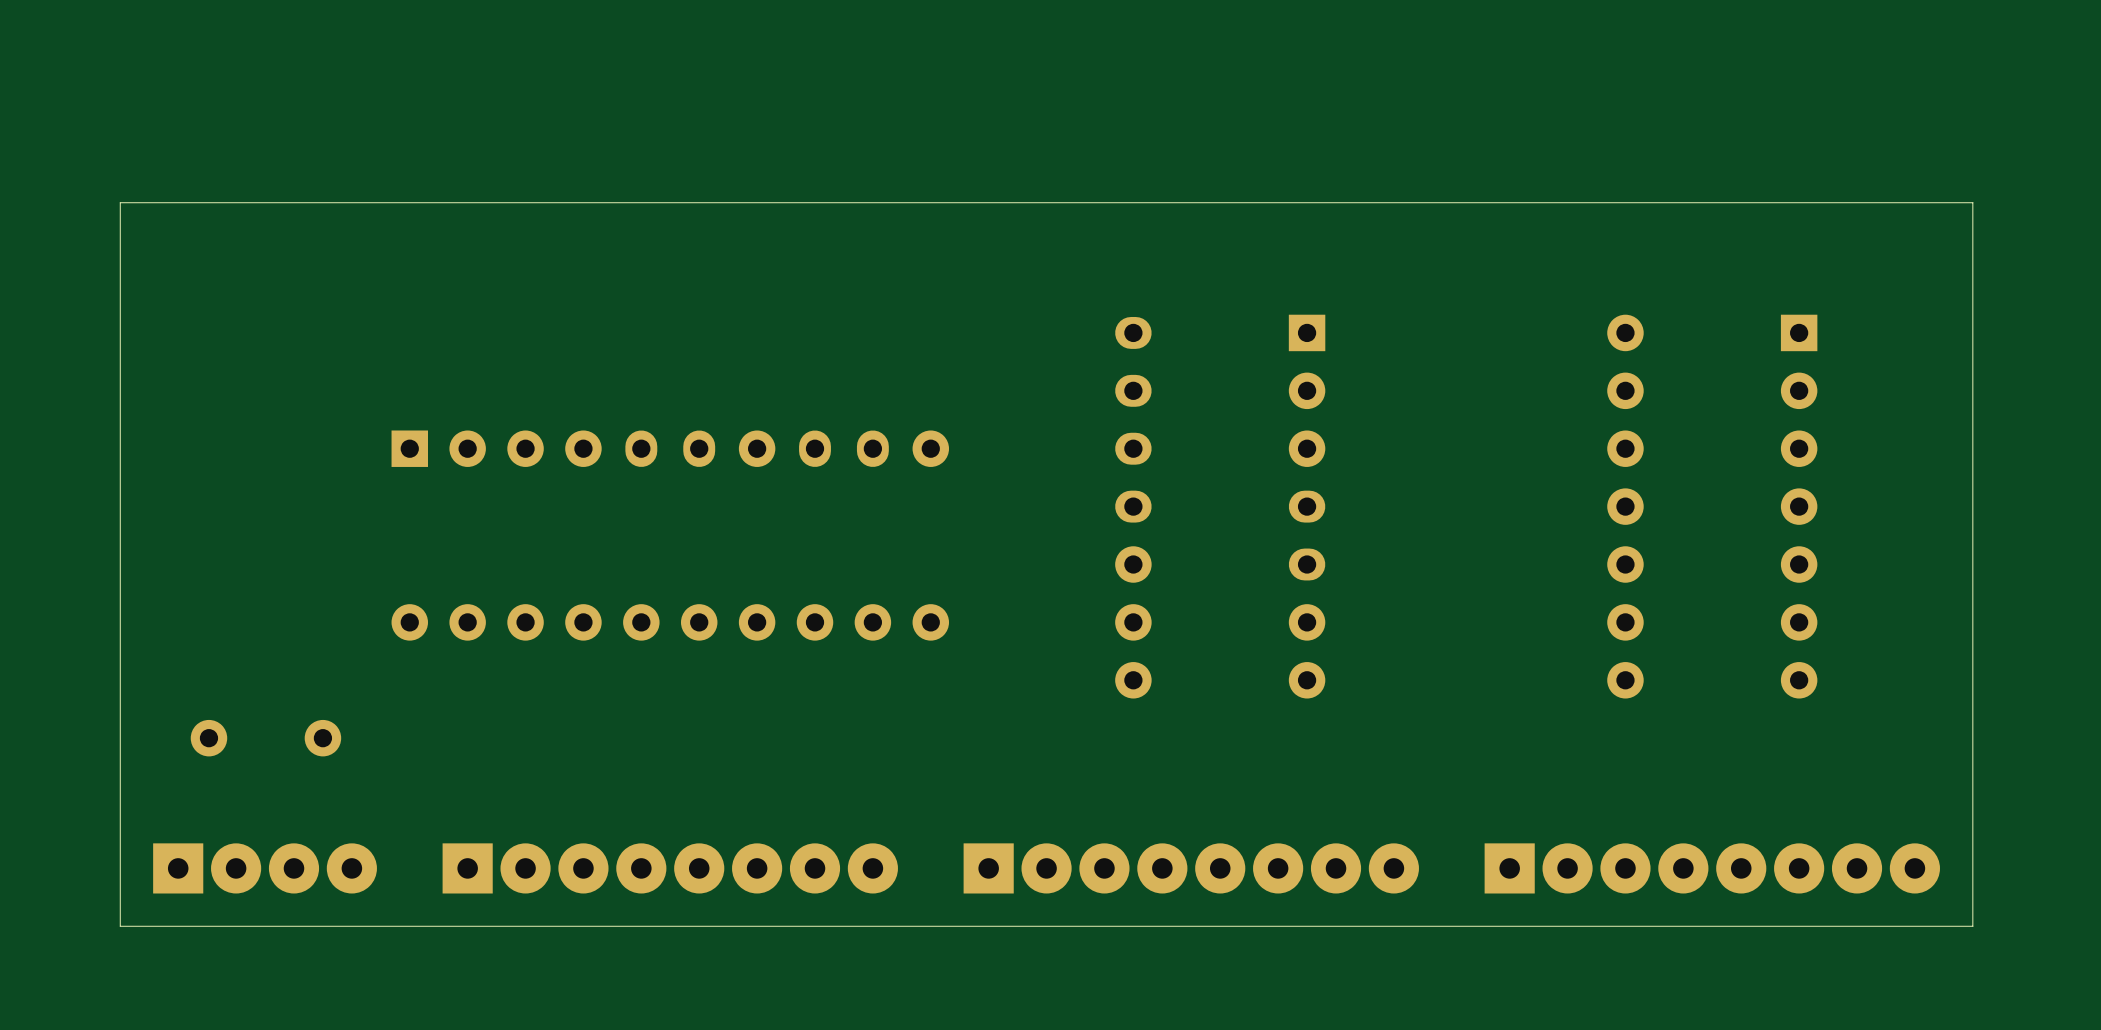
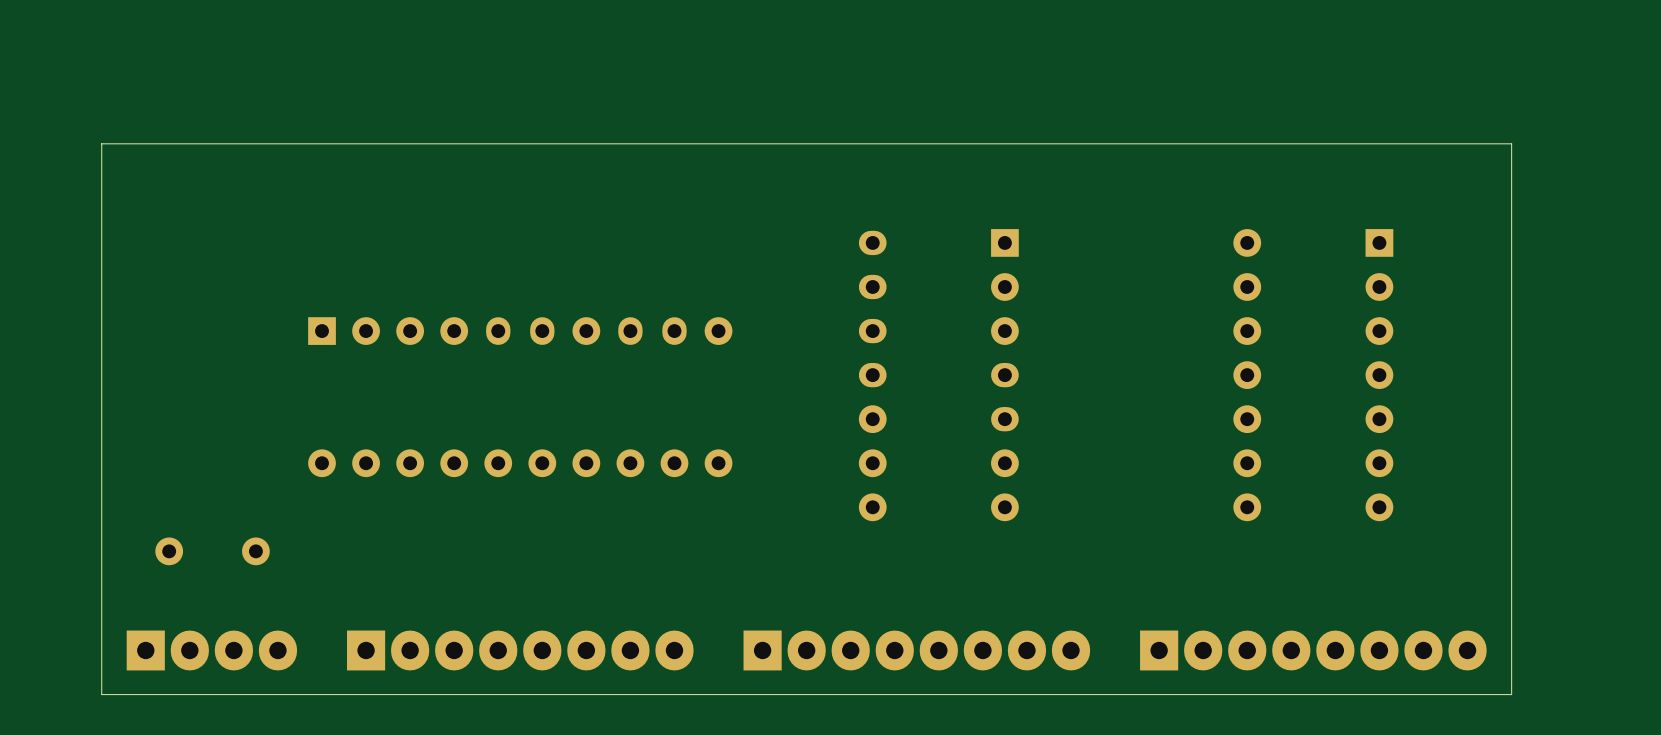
part footprint: [153, 843, 377, 894] -> [126, 630, 298, 671]
part footprint: [442, 843, 898, 894] -> [346, 630, 694, 671]
part footprint: [963, 843, 1419, 894] -> [743, 630, 1091, 671]
part footprint: [1484, 843, 1940, 894] -> [1140, 630, 1487, 671]

